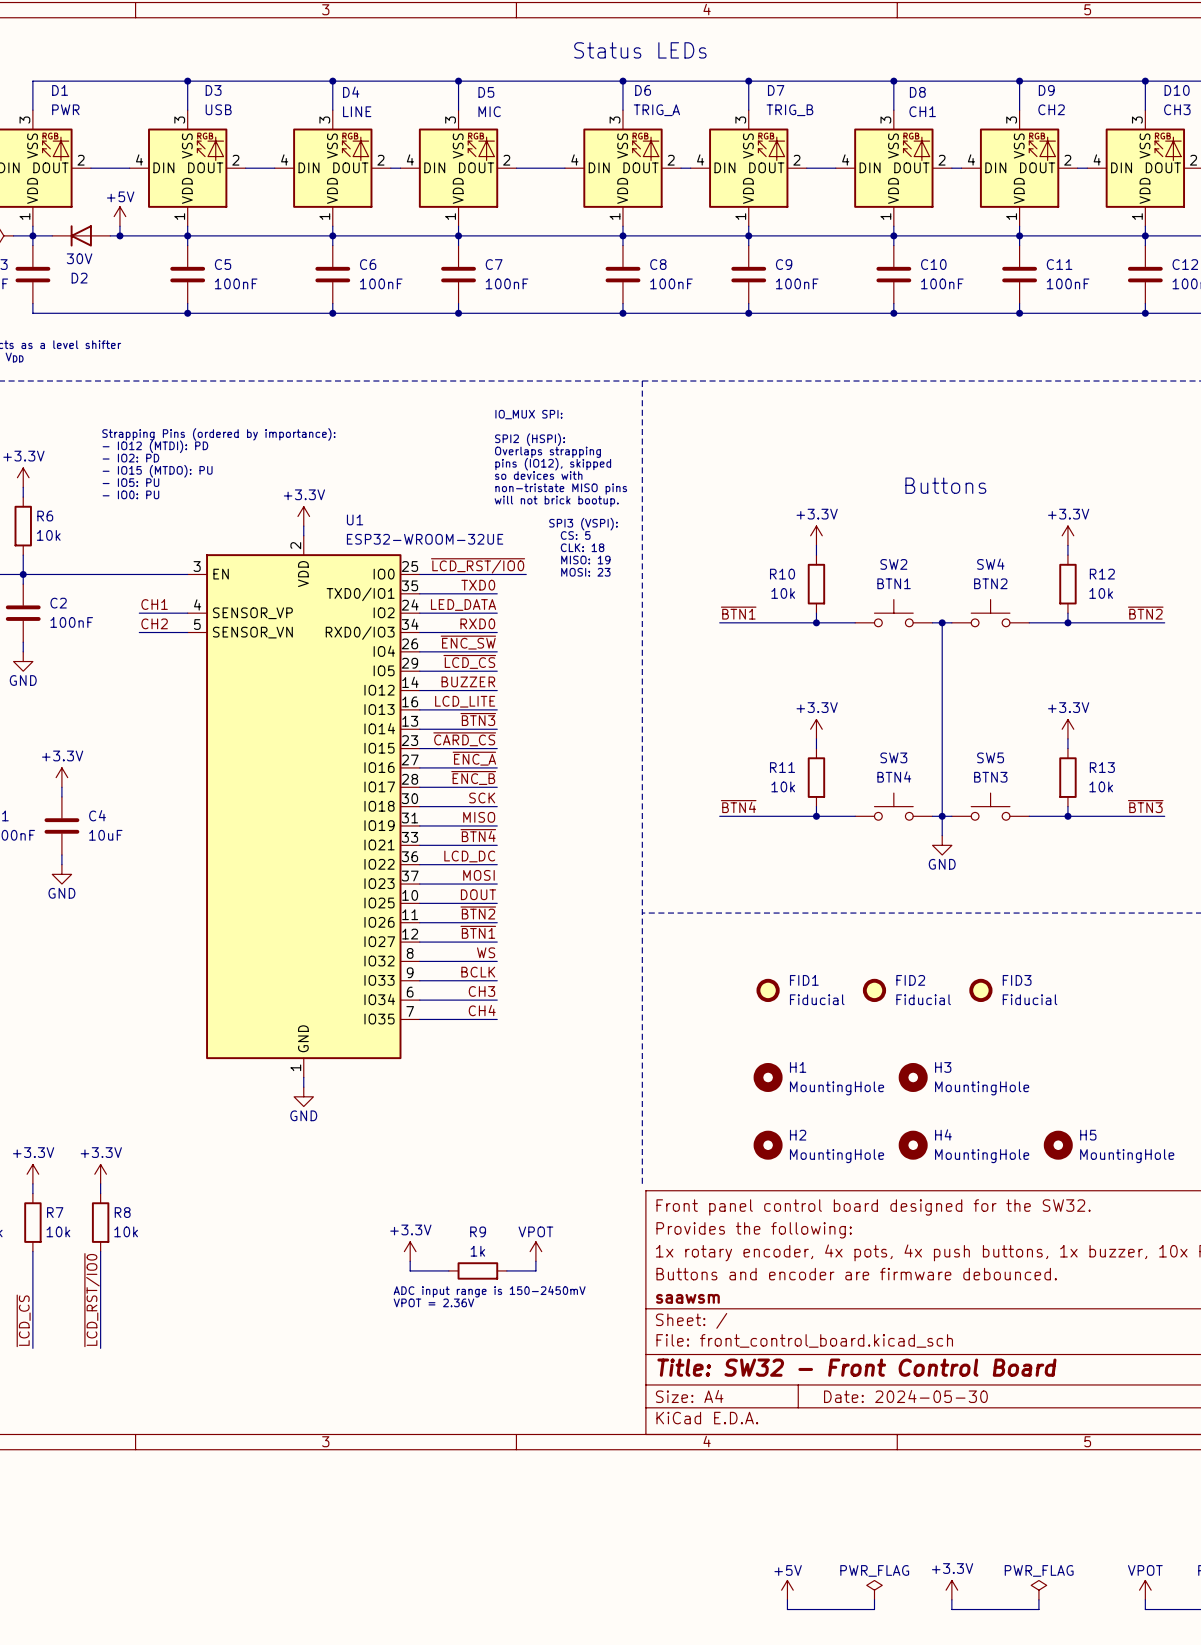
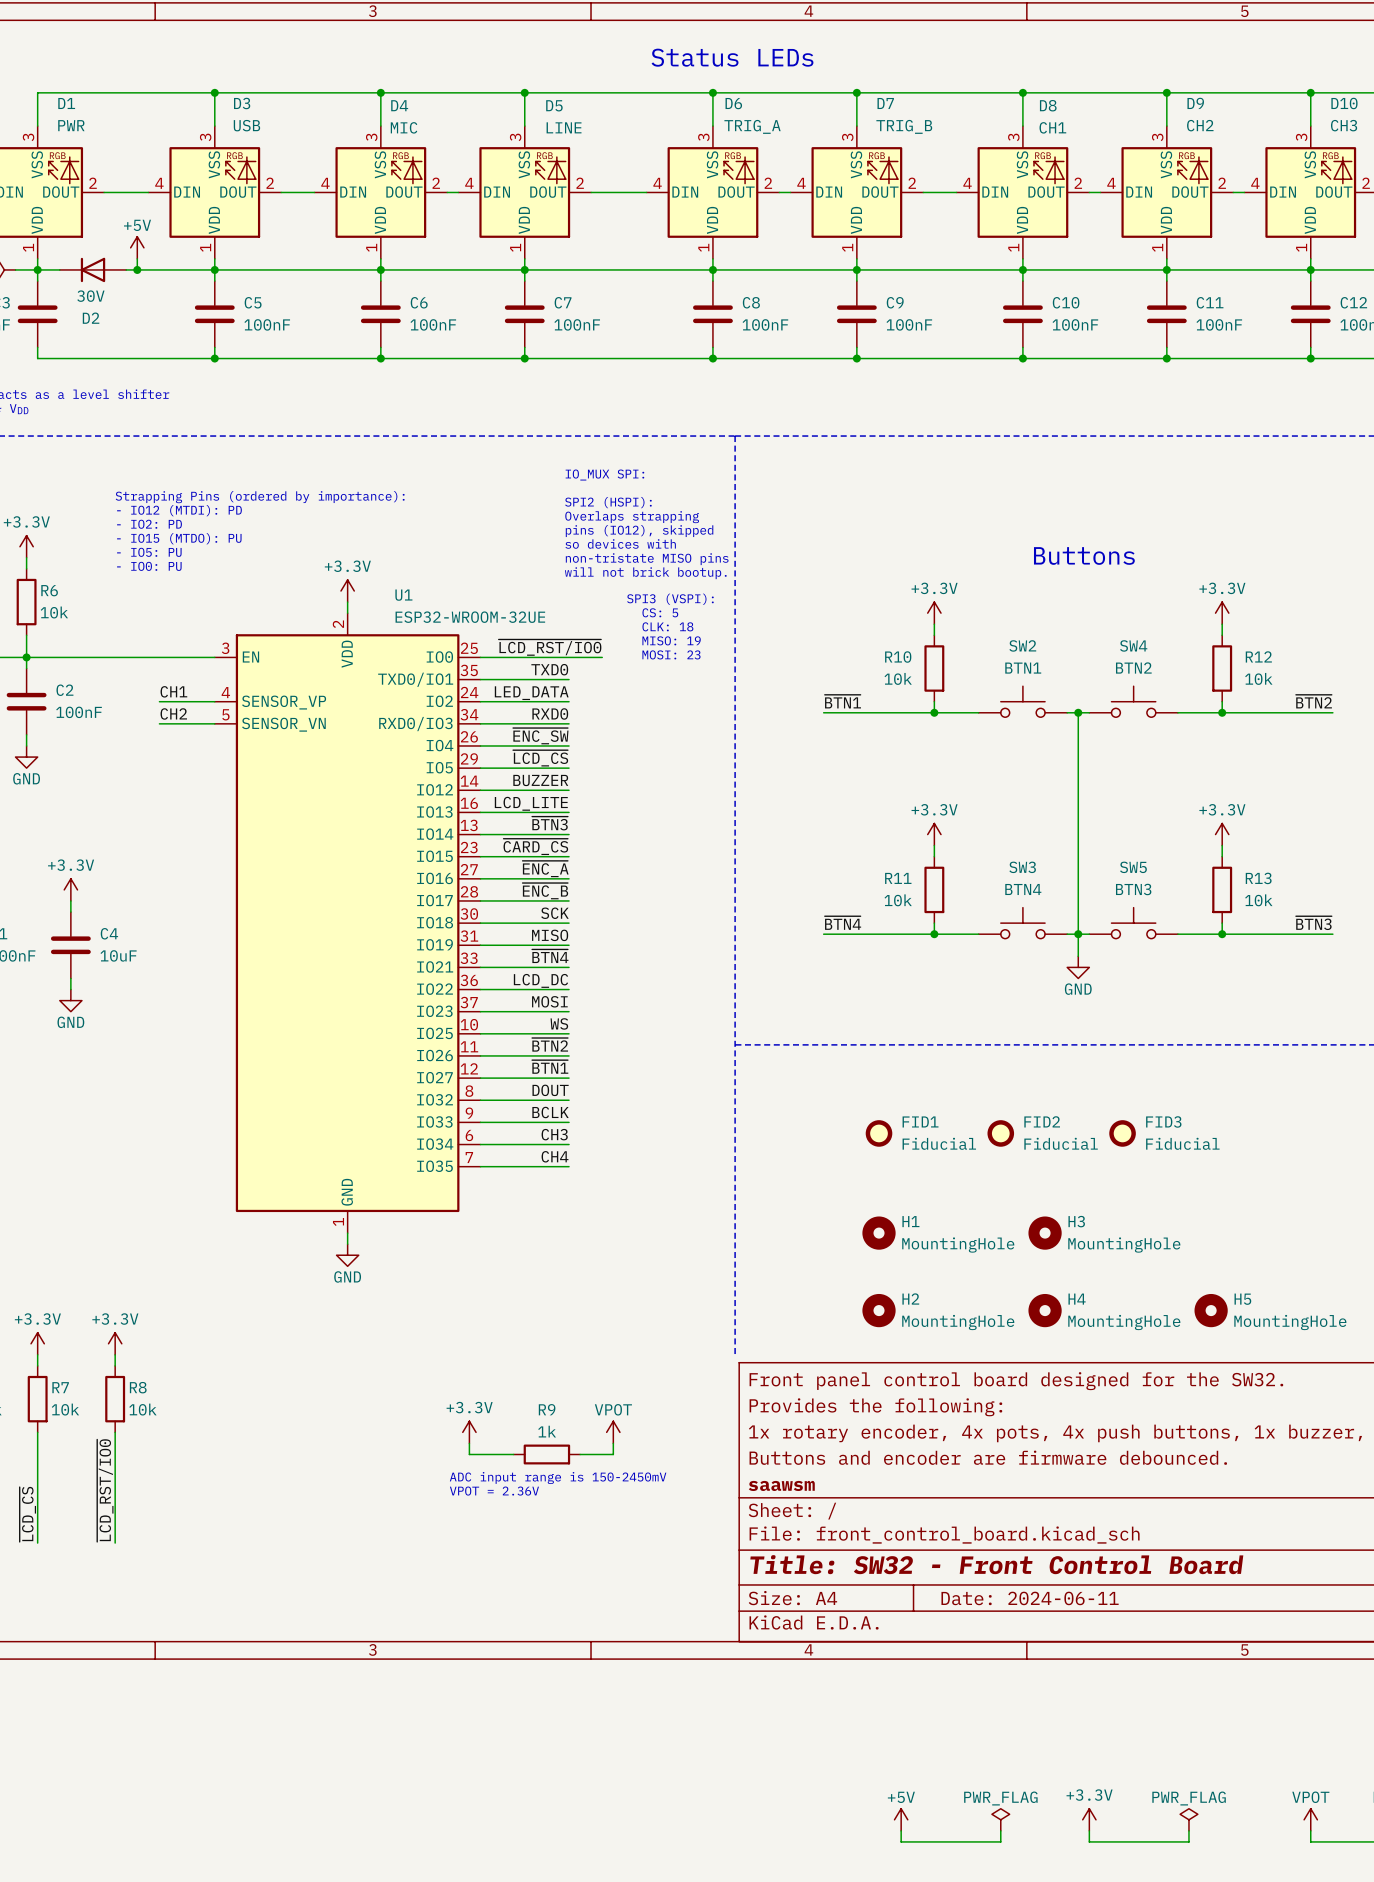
D4 value: LINE (357, 111) -> MIC (404, 127)
D5 value: MIC (489, 111) -> LINE (564, 127)
label: DOUT (478, 894) -> WS (559, 1023)
label: WS (486, 952) -> DOUT (550, 1090)
title block: Date: 2024-05-30 (905, 1396) -> Date: 2024-06-11 (1030, 1598)

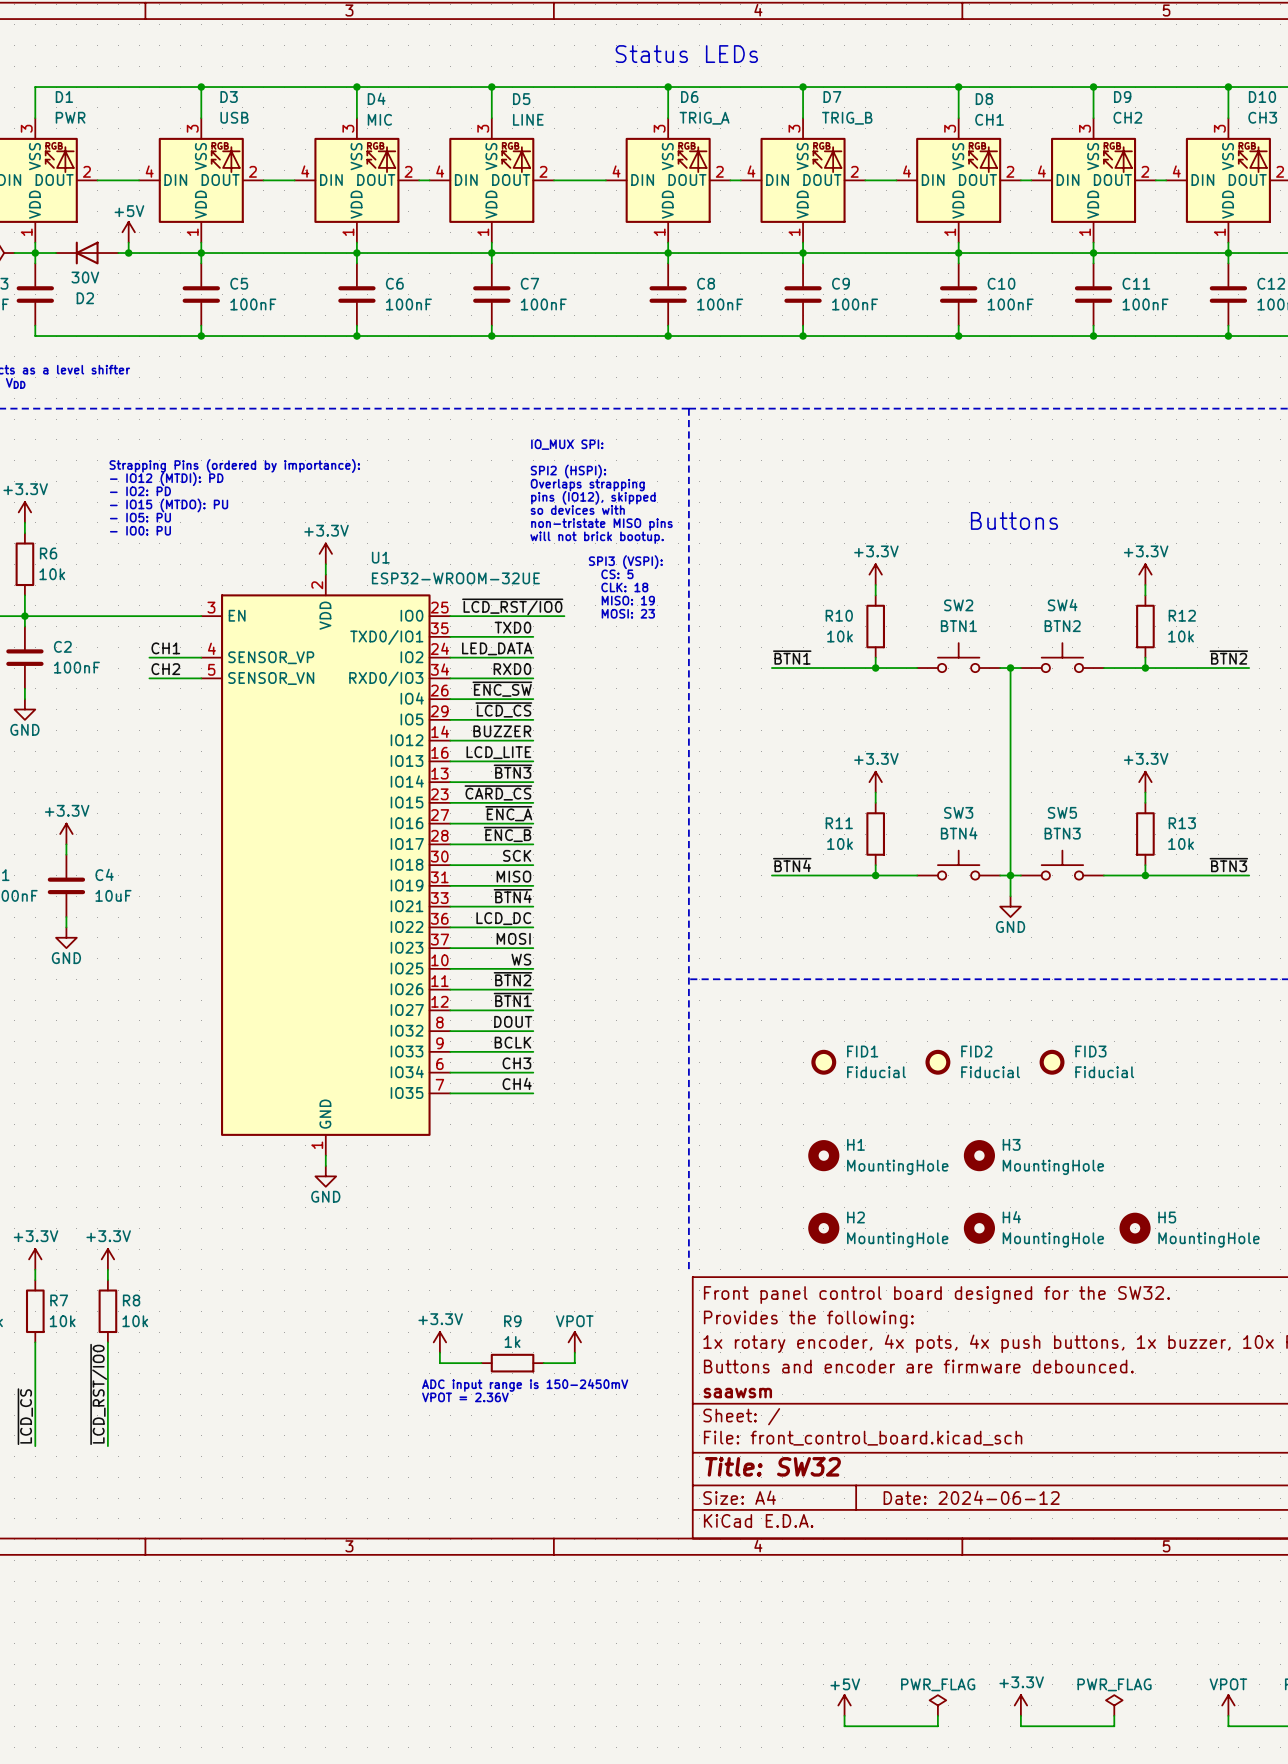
title block: Title: SW32 - Front Control Board (996, 1564) -> Title: SW32 (773, 1466)
title block: Date: 2024-06-11 (1030, 1598) -> Date: 2024-06-12 (971, 1497)

